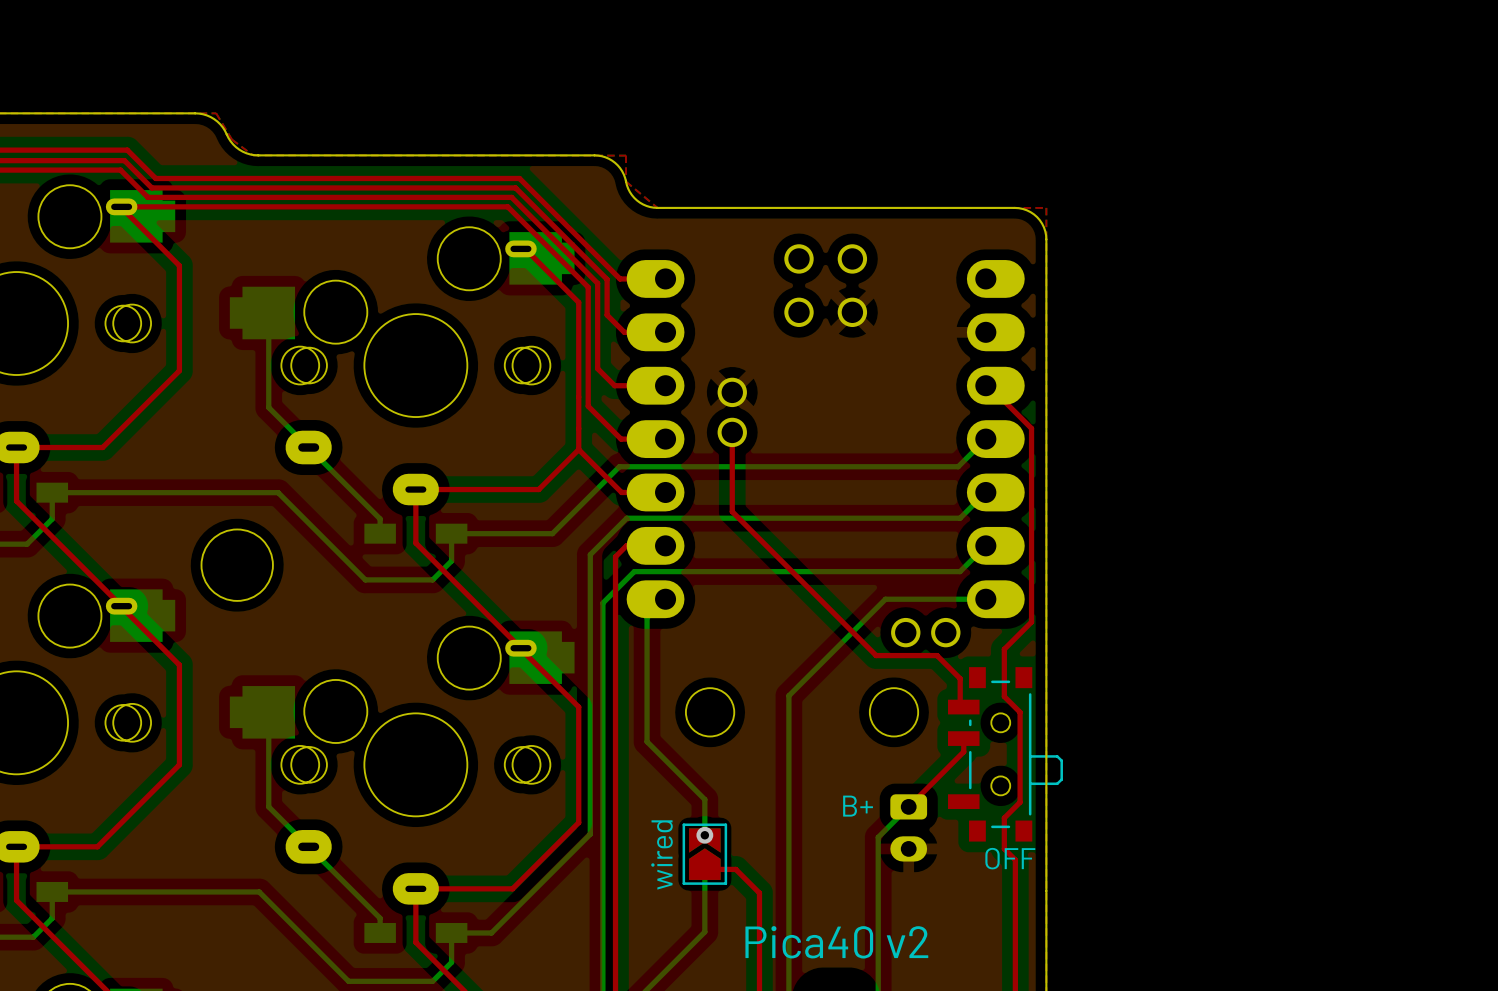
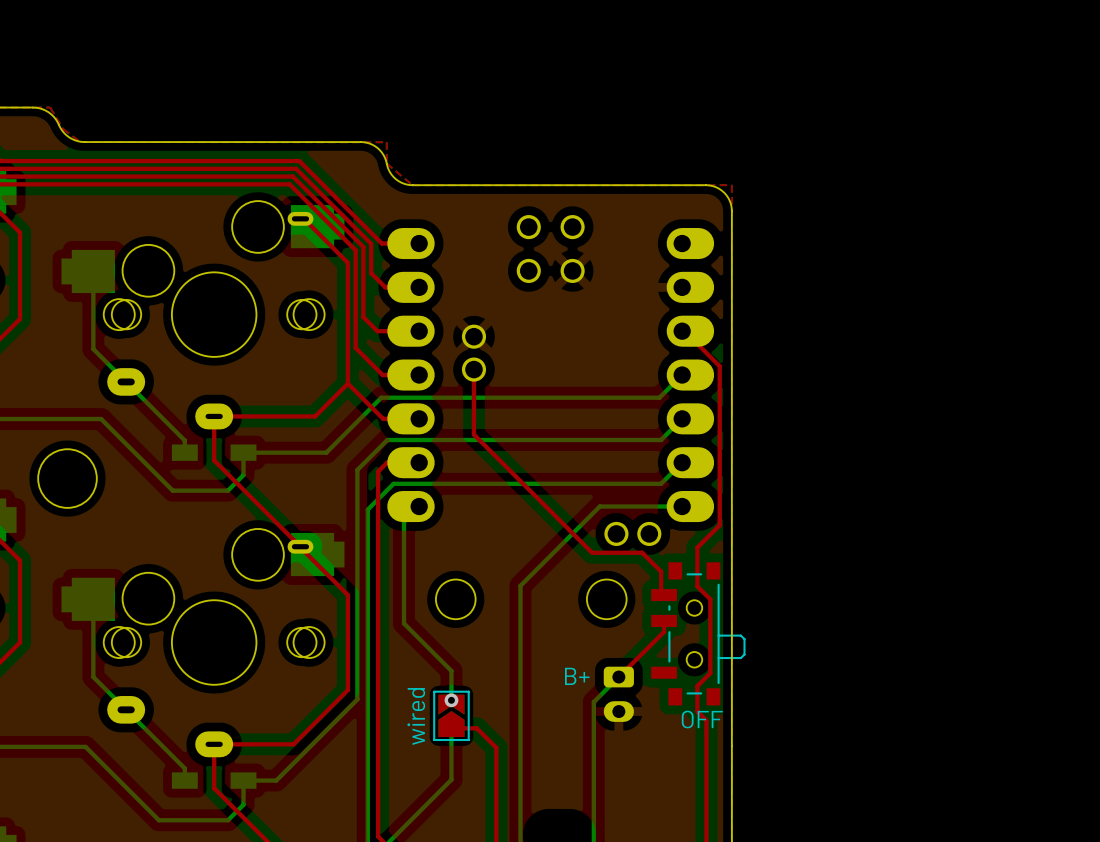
text: Pica40 v2 (836, 942) -> none

